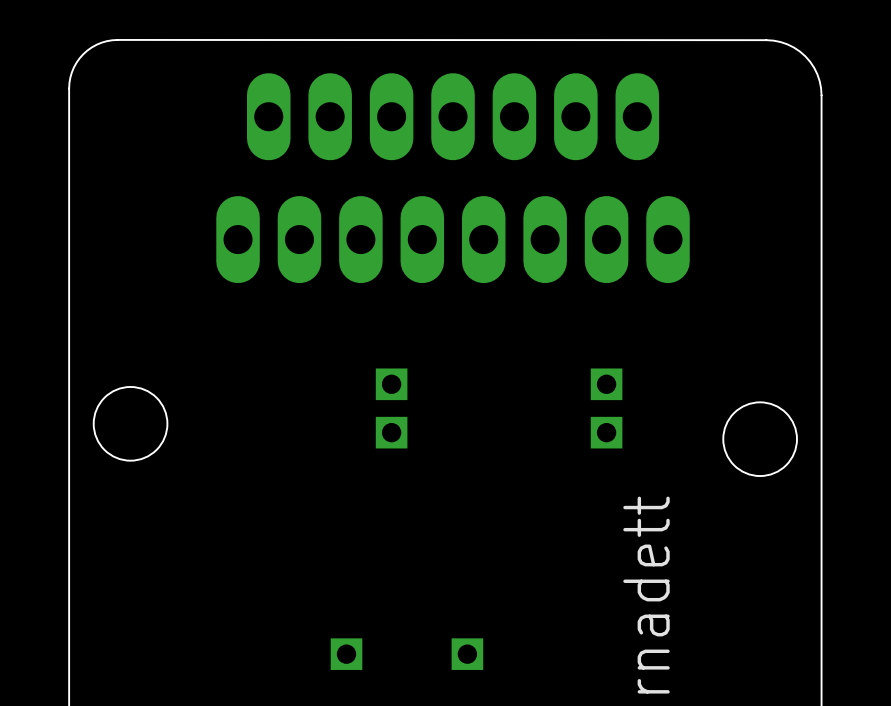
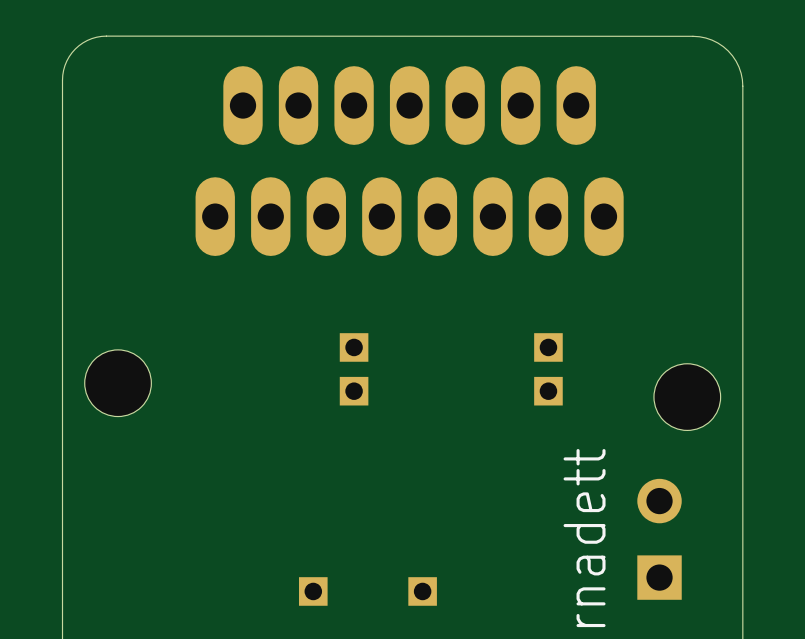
part: none -> (659, 539)

